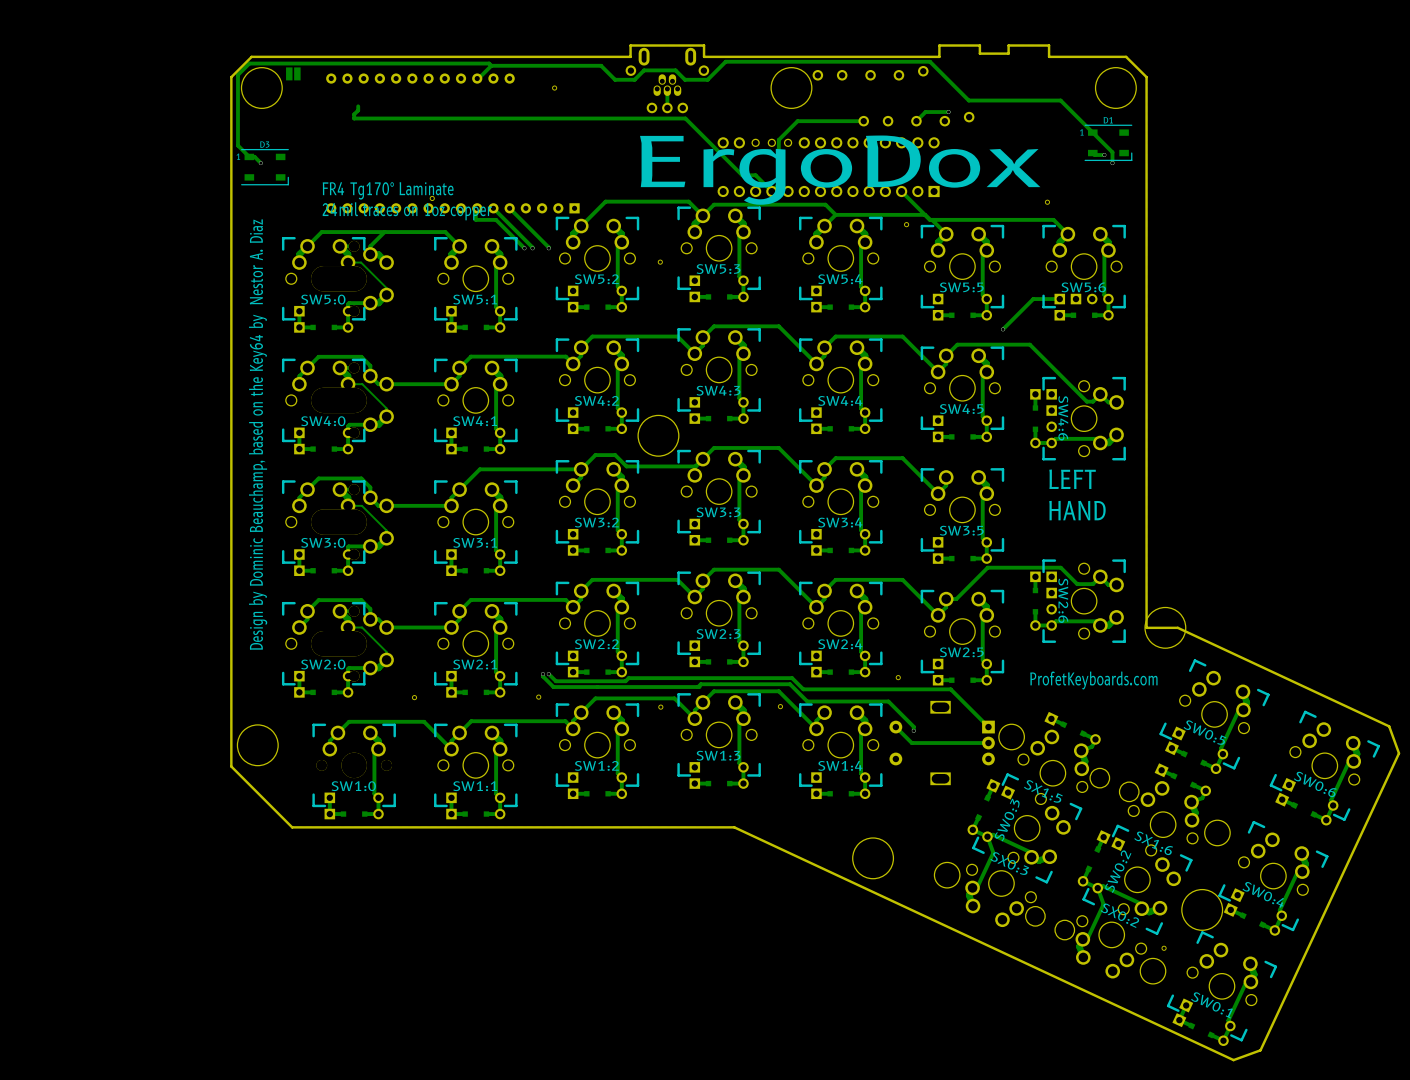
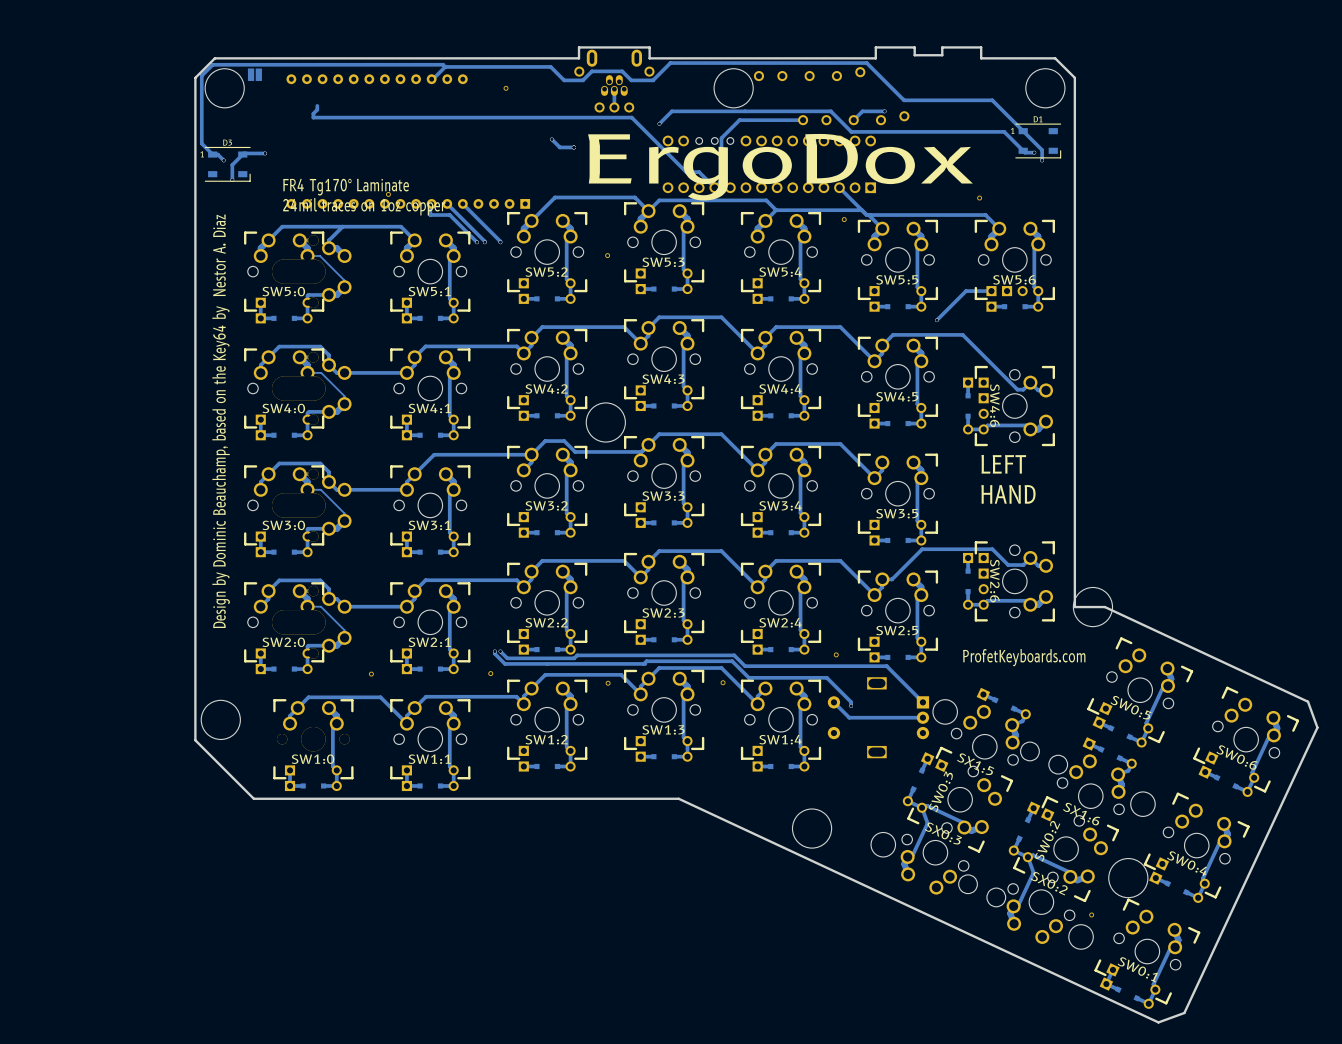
track: none -> (659, 123) (671, 111) (830, 111) (851, 131) (1004, 131) (1023, 150)
via: none -> (659, 123)
track: none -> (551, 139) (559, 147) (573, 147)
via: none -> (551, 139)
via: none -> (573, 147)
track: none -> (265, 153) (243, 153) (232, 164) (232, 179)
via: none -> (265, 153)
via: none -> (232, 179)

